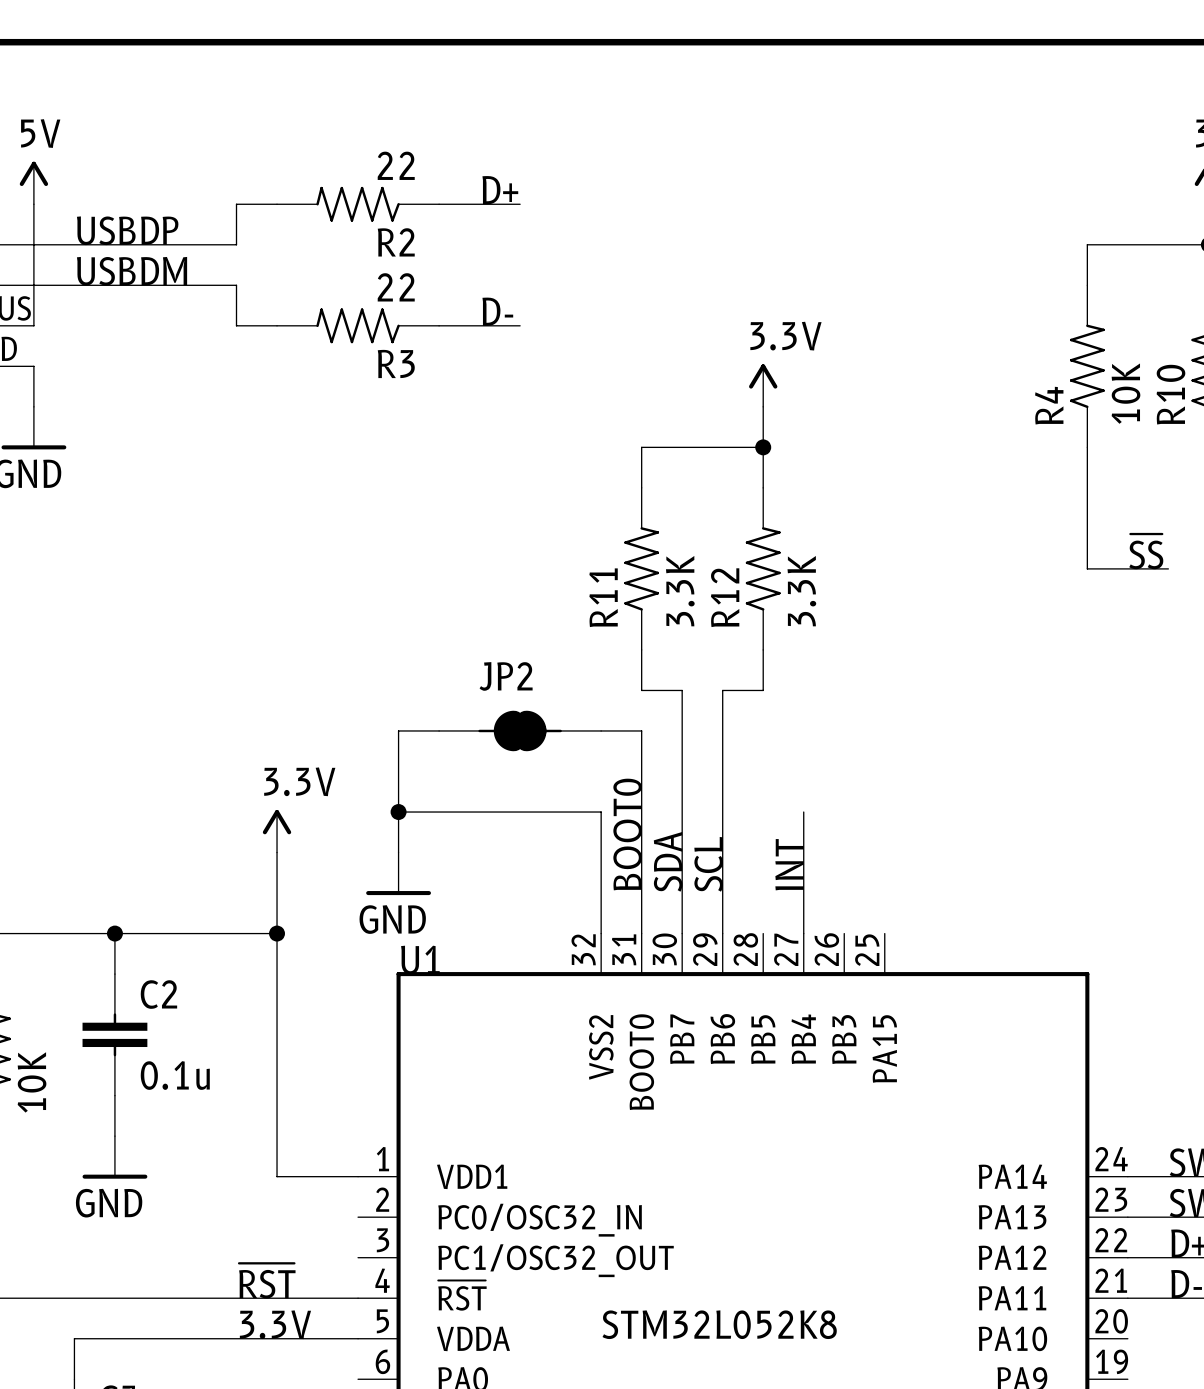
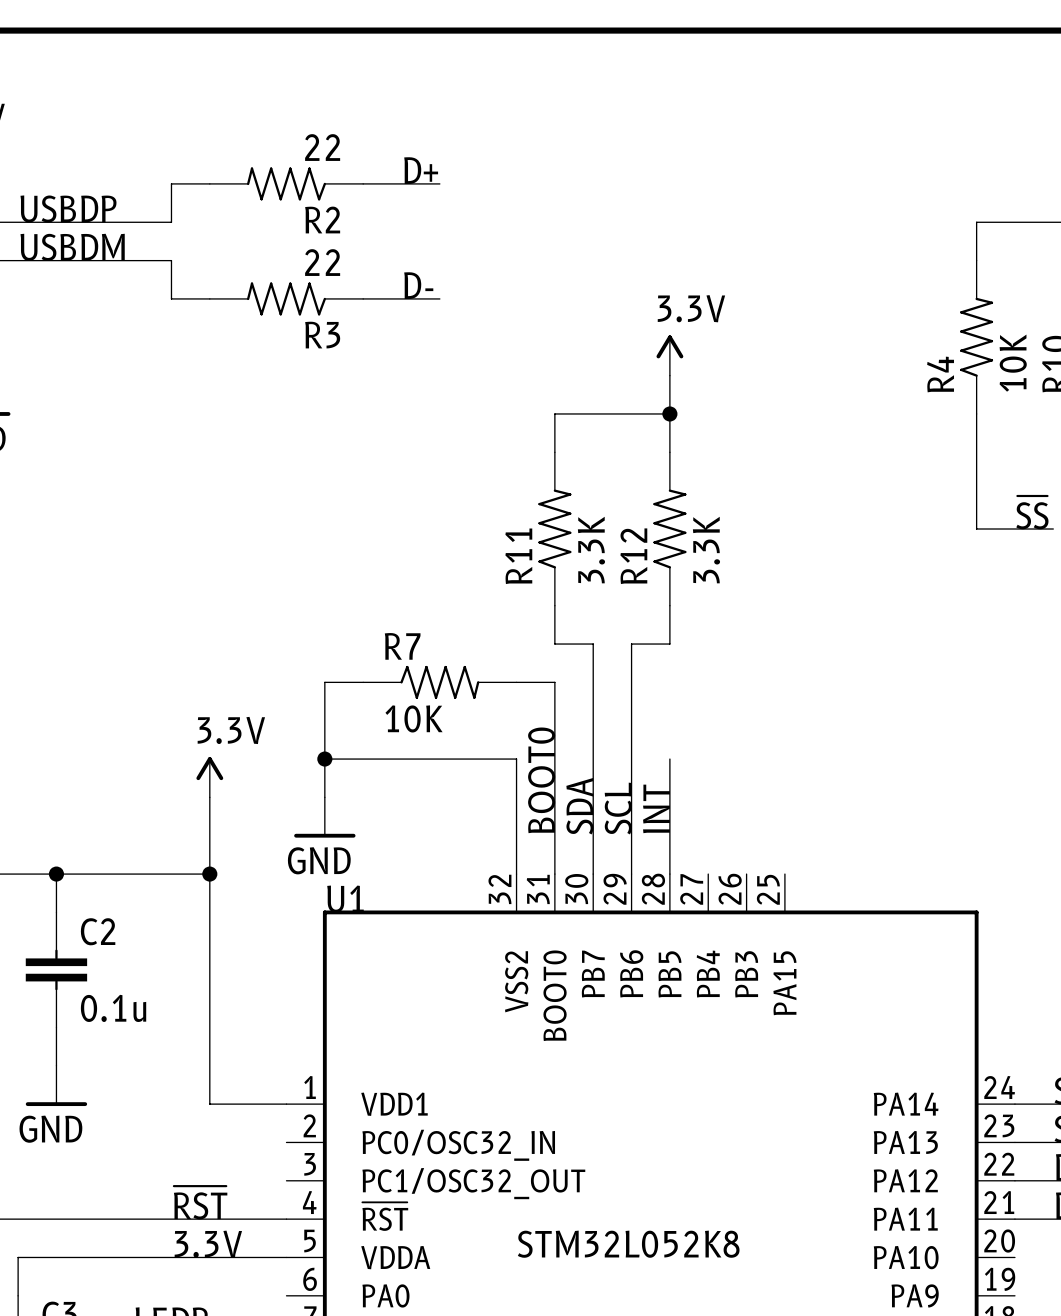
JP2: (520, 730) -> none
R7: none -> 10K (439, 682)
wire: (803, 812) (803, 933) -> (669, 759) (669, 874)
label position: INT (789, 864) -> INT (656, 808)

